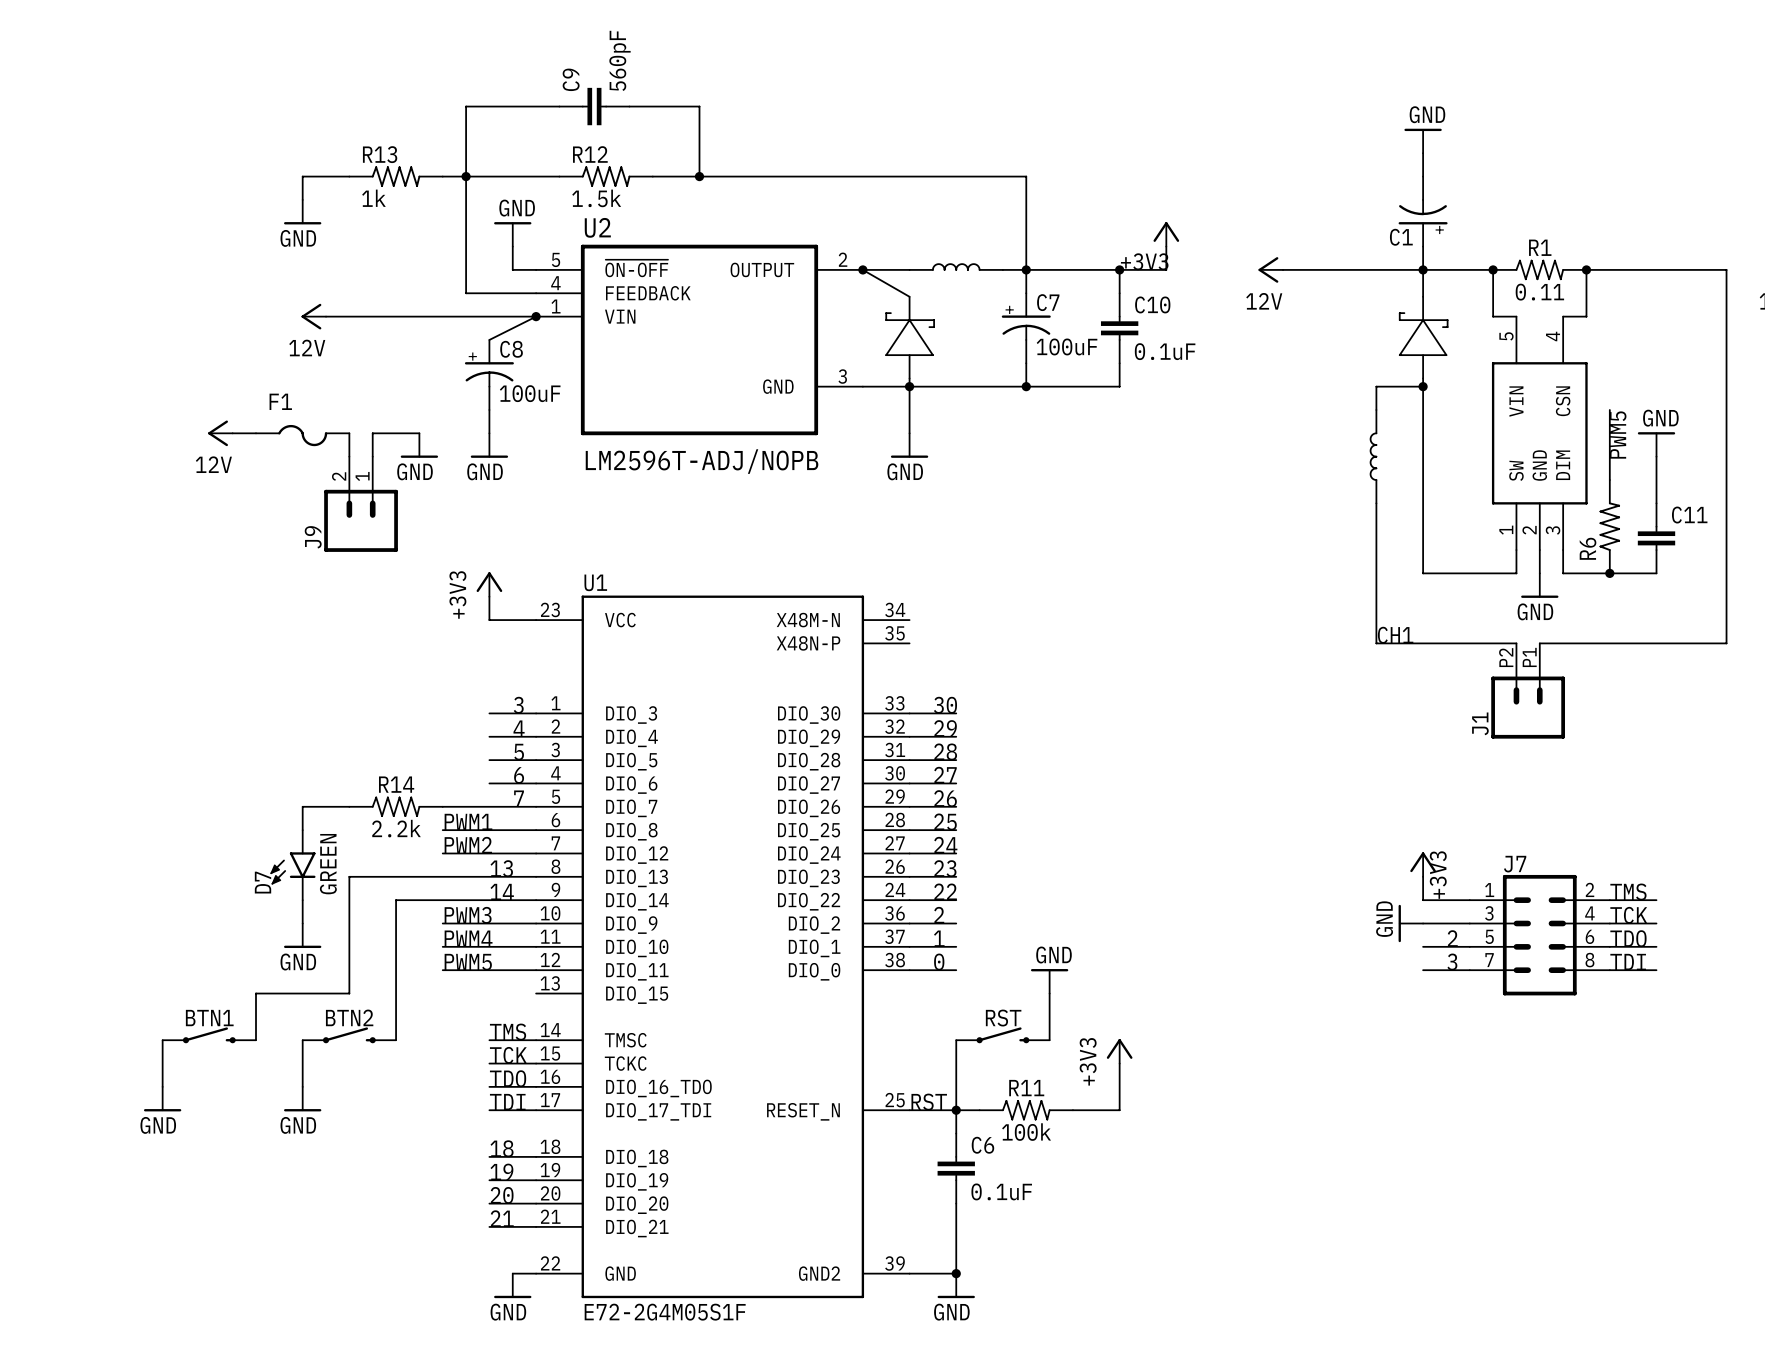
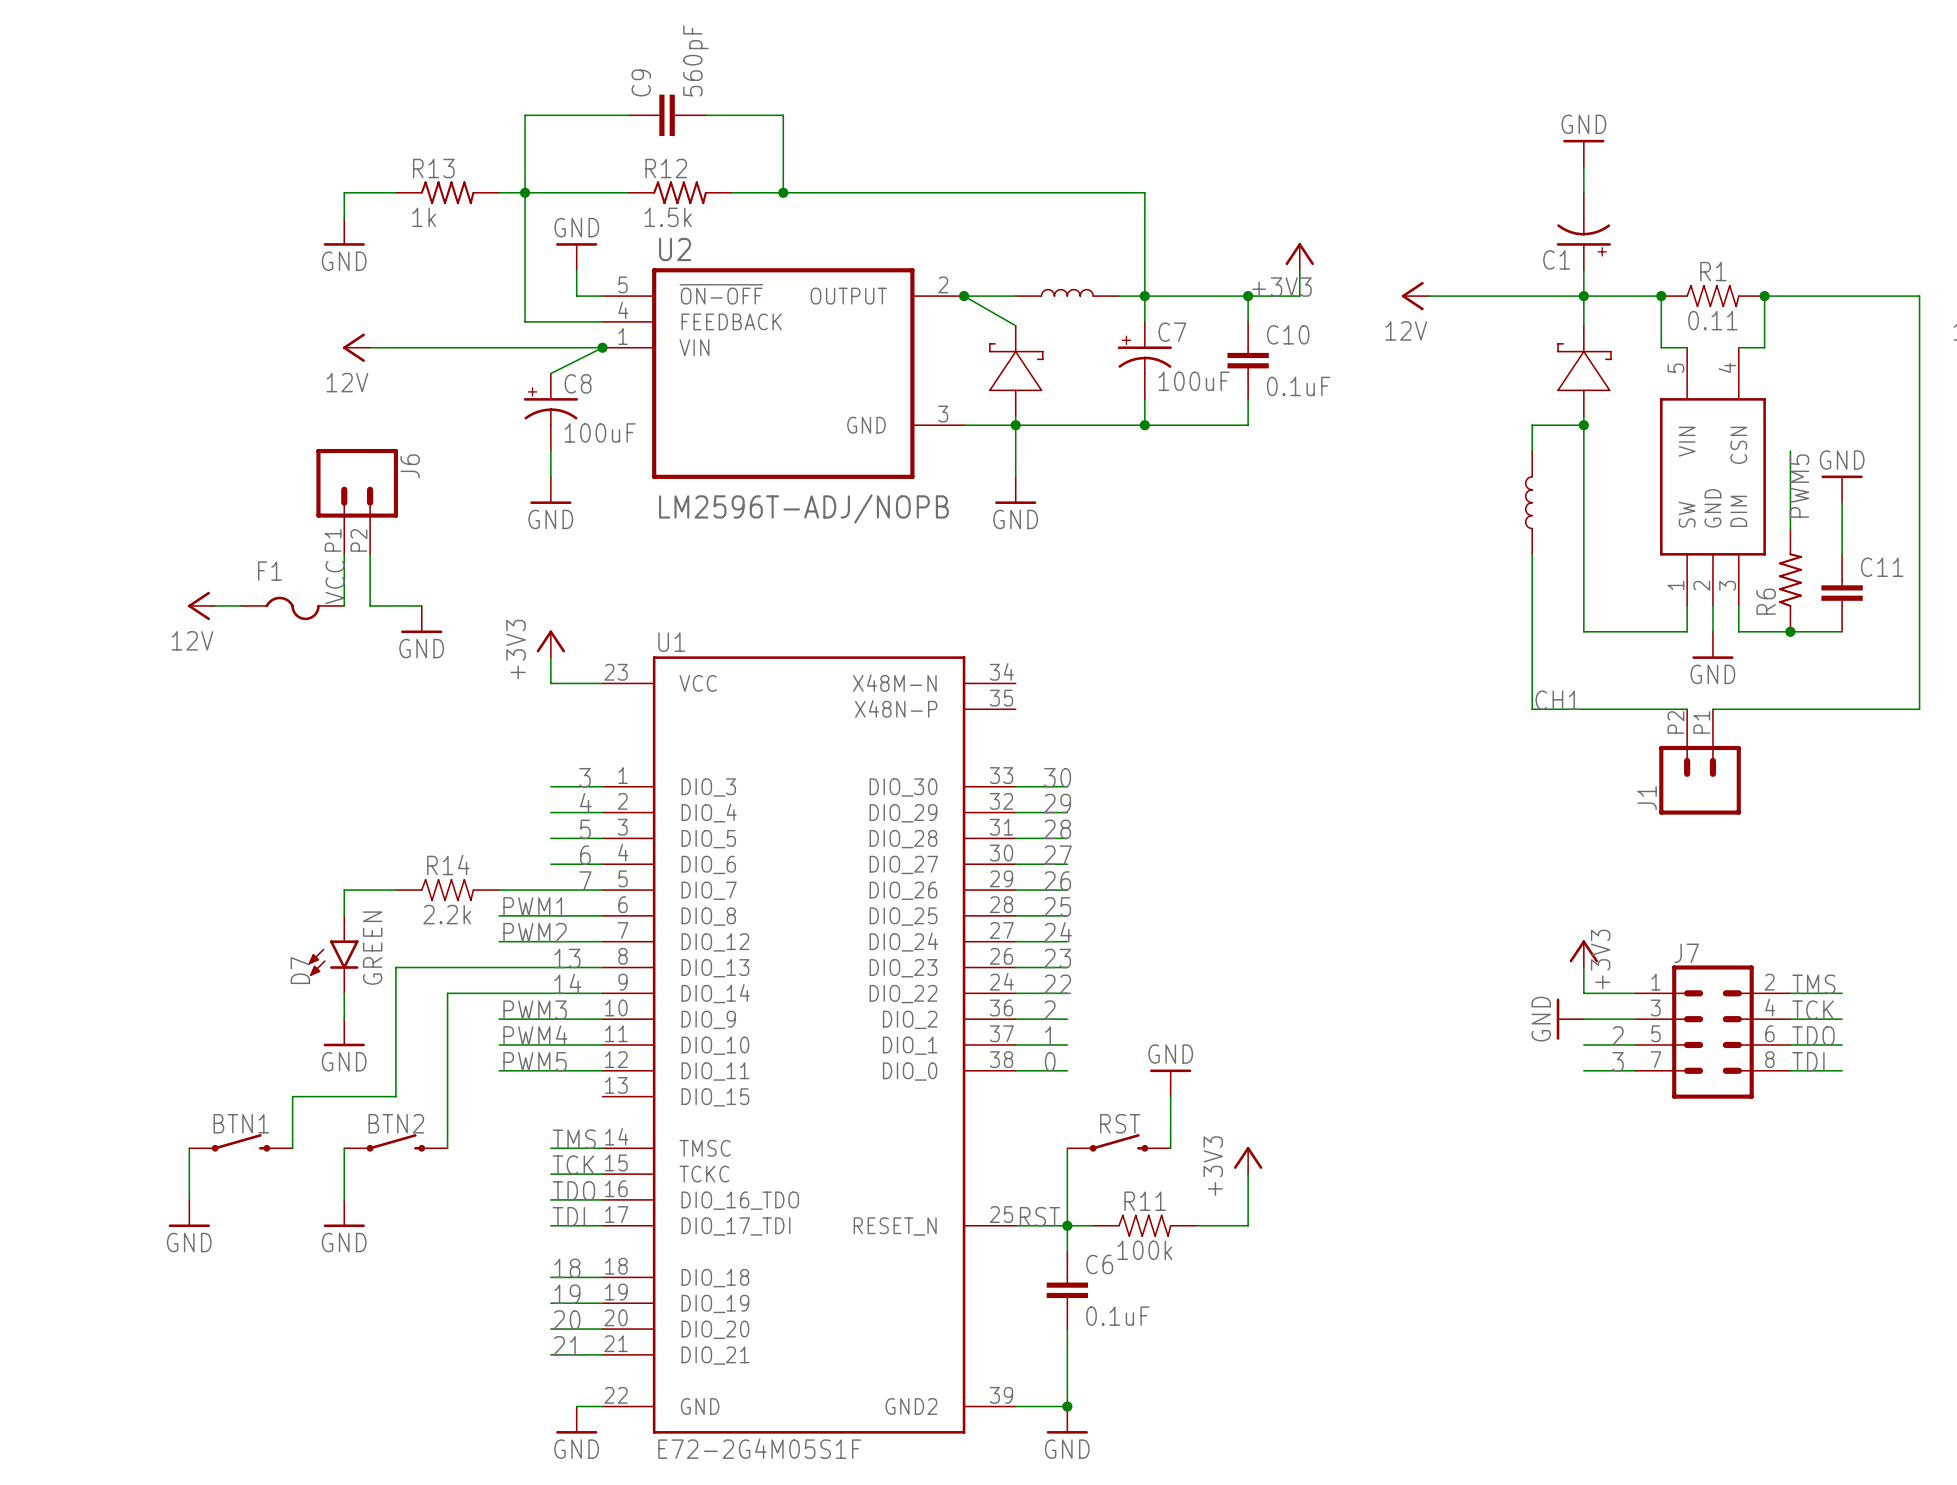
power symbol position: 12V (220, 433) -> 12V (201, 605)
wire: (232, 433) (256, 433) -> (215, 605) (240, 605)
wire: (419, 433) (372, 433) (372, 456) -> none
F1 position: (302, 435) -> (292, 608)
power symbol position: GND (419, 445) -> GND (421, 619)
J6: none -> (357, 501)
wire: none -> (344, 554) (344, 605)
J9: (361, 504) -> none
label: none -> VCC (335, 582)

